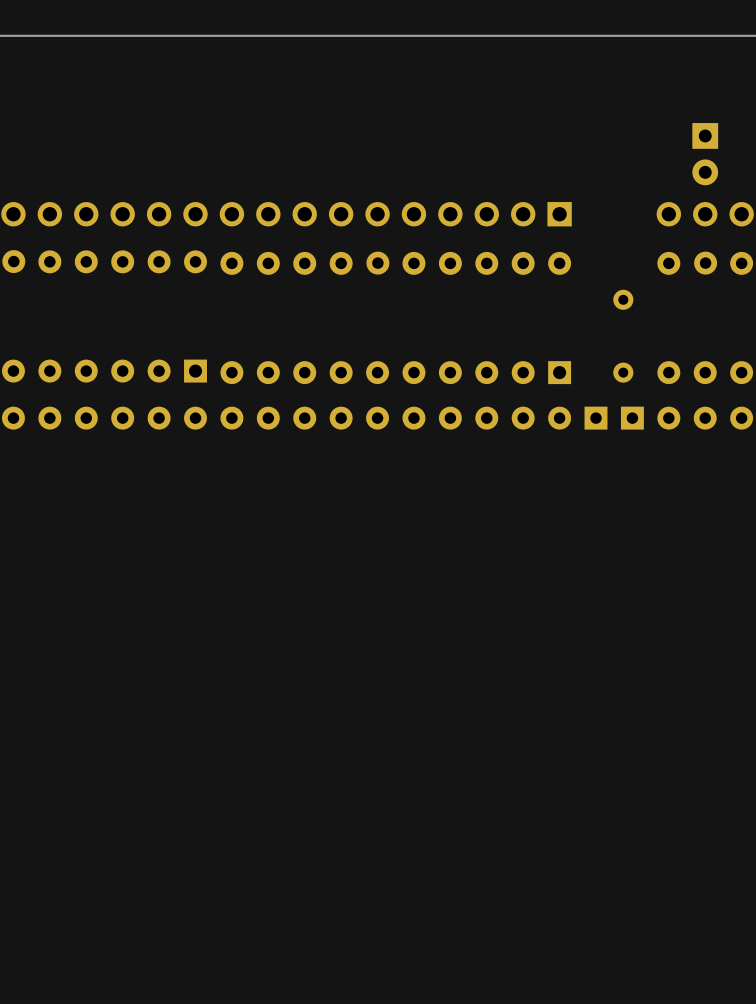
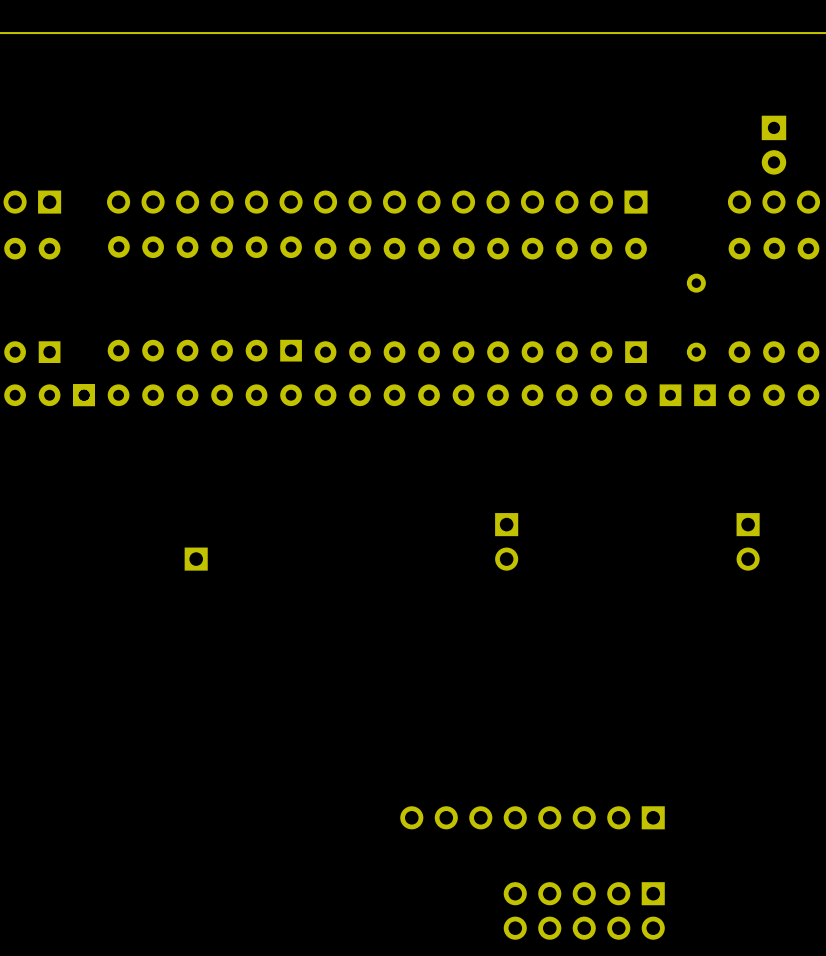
part: none -> (506, 541)
part: none -> (748, 541)
part: none -> (196, 559)
part: none -> (532, 817)
part: none -> (584, 910)

